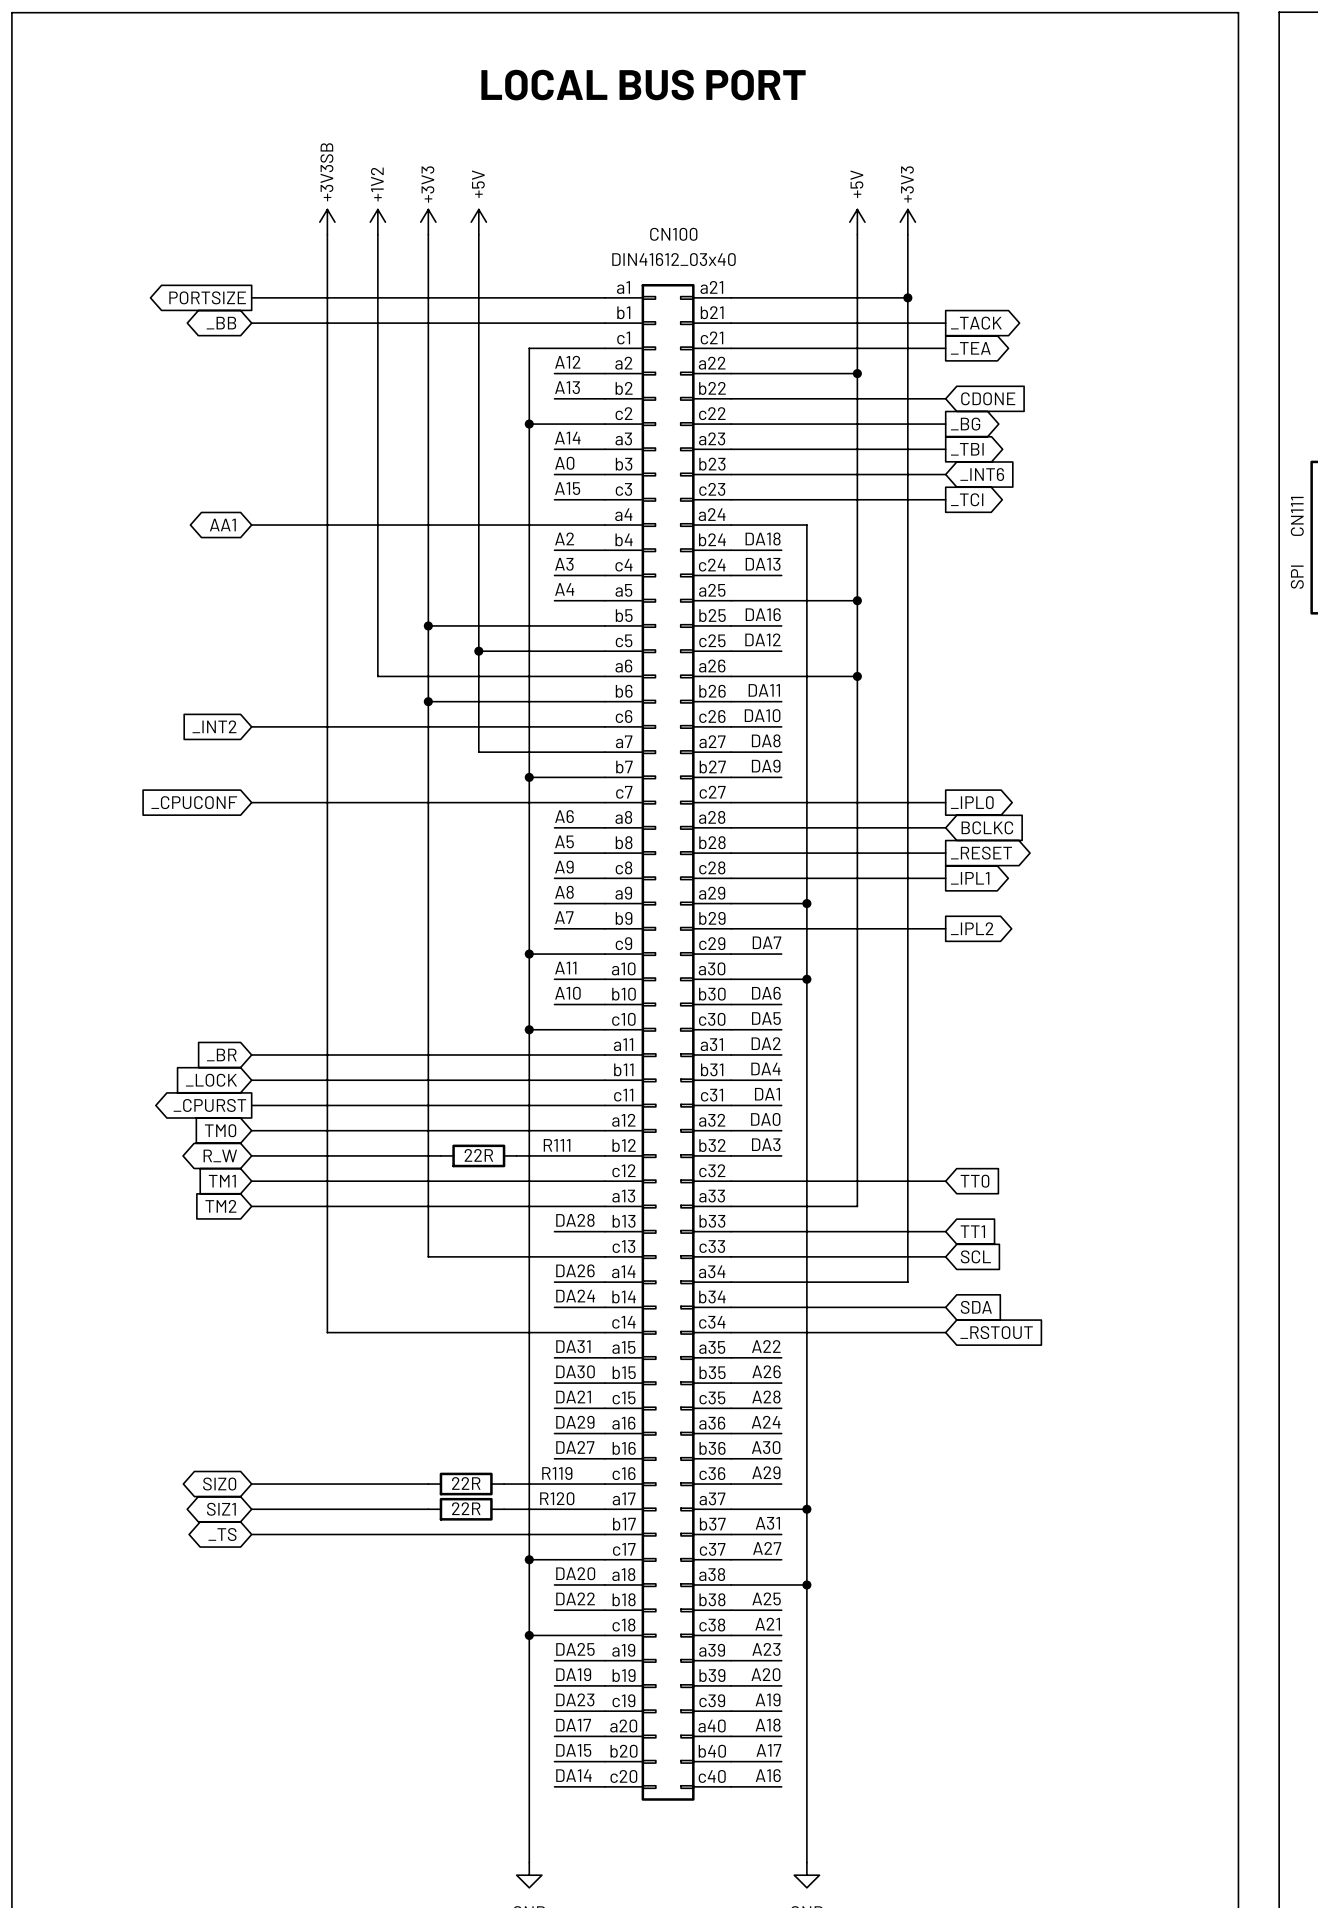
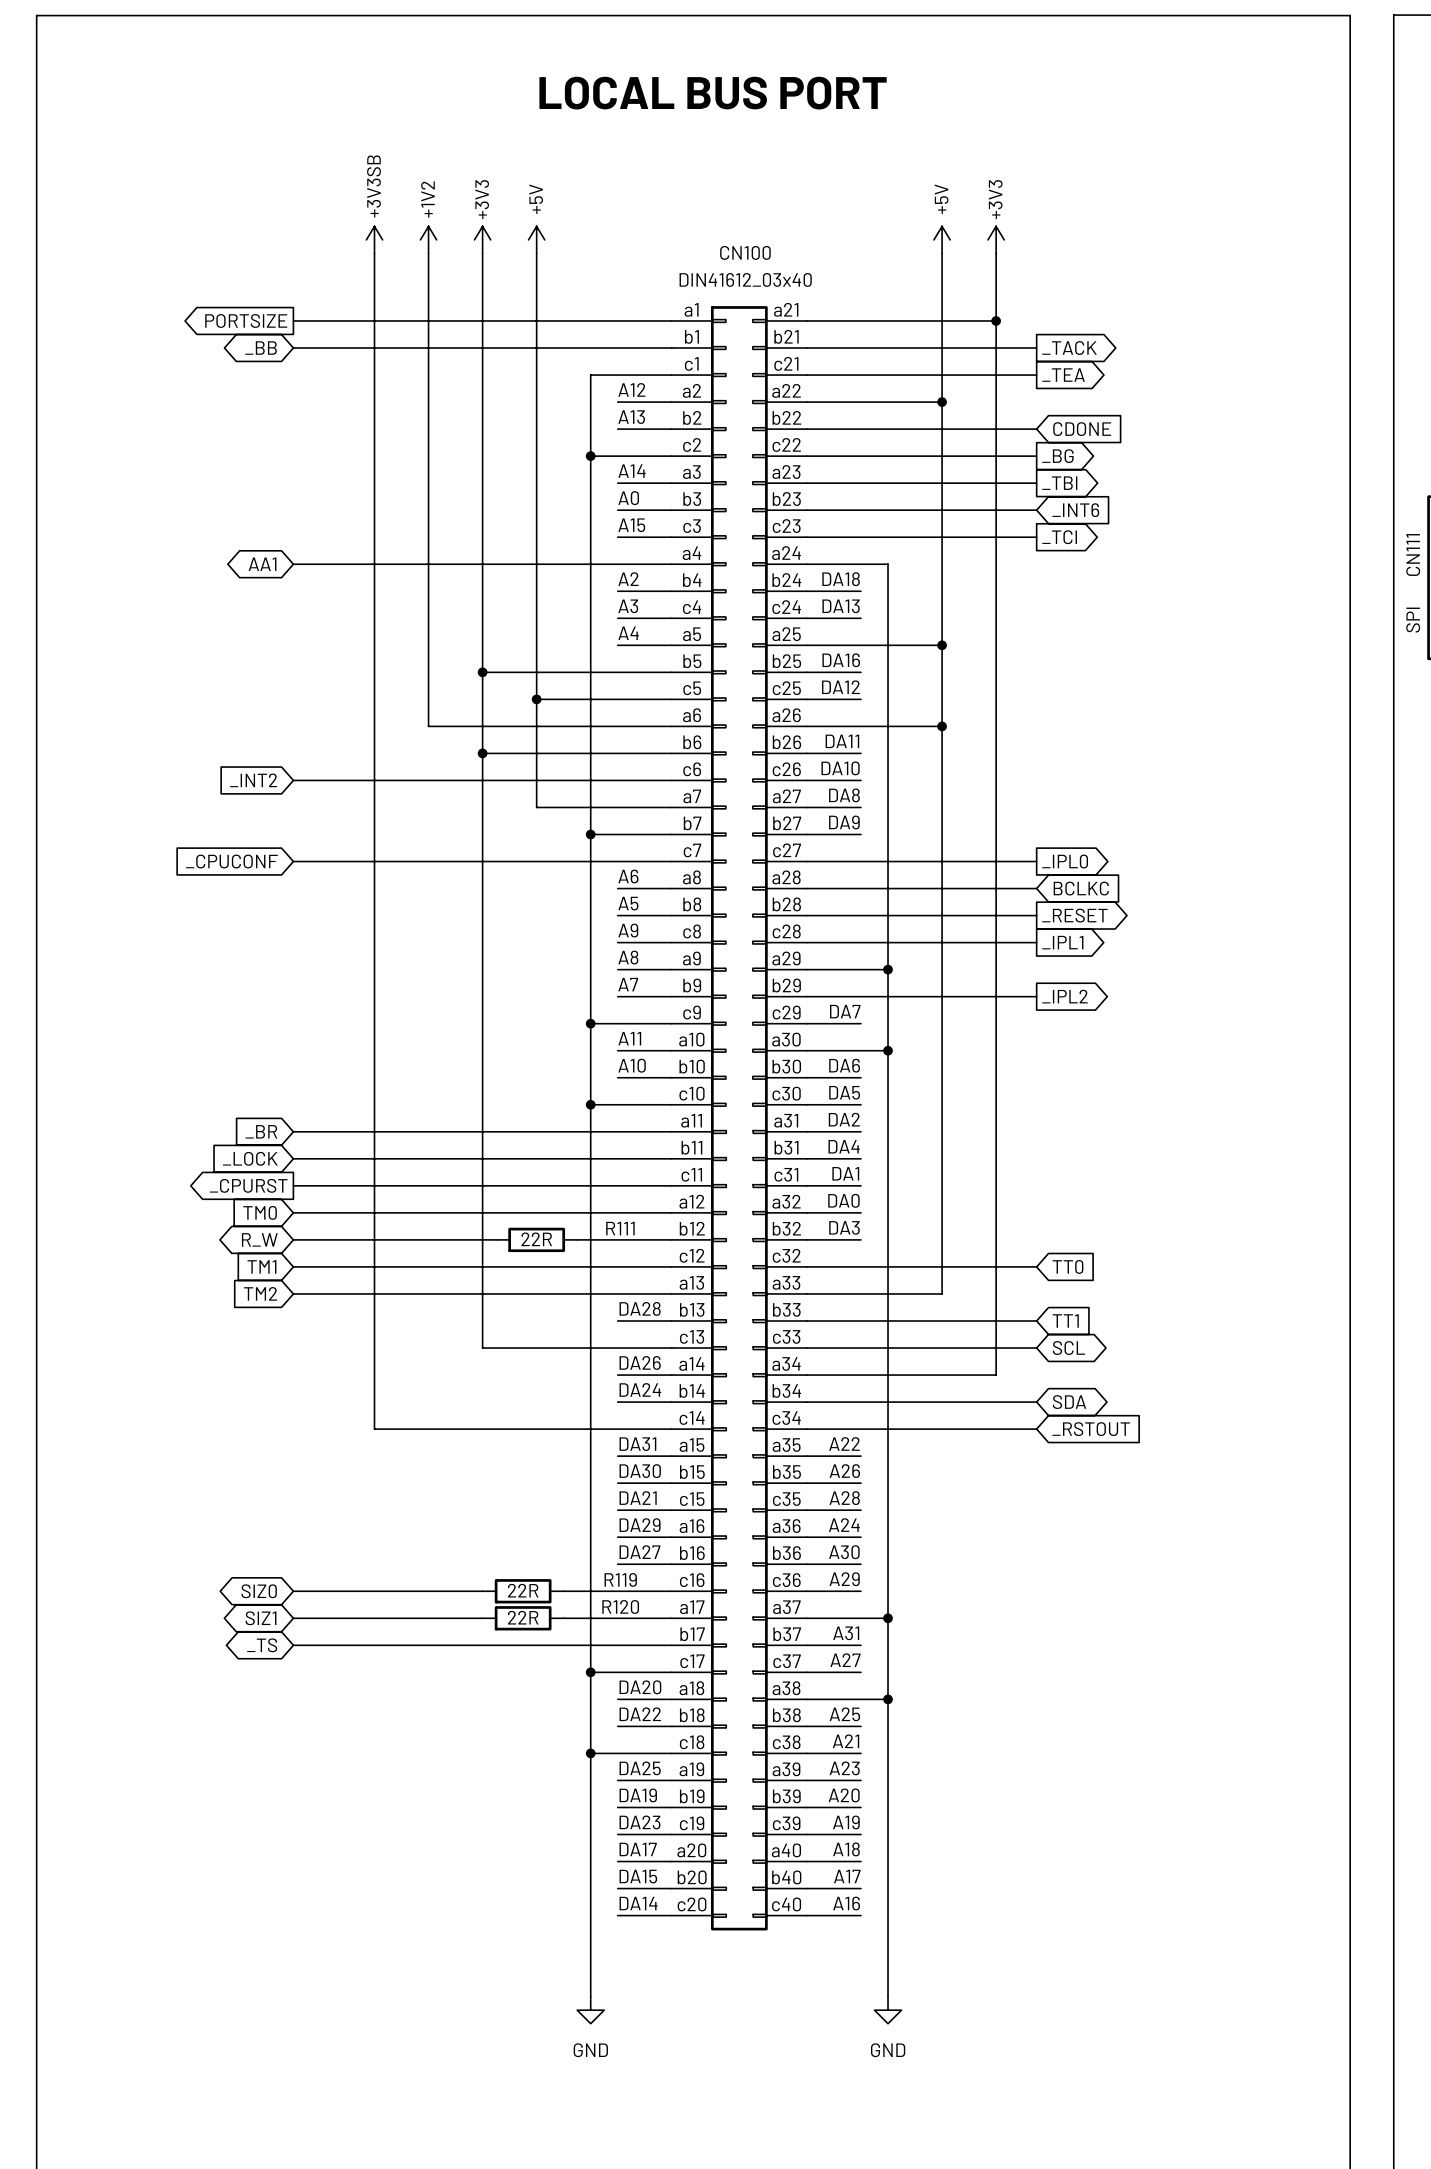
global label shape: input (975, 1256) -> bidirectional (1068, 1348)
global label shape: input (976, 1307) -> bidirectional (1069, 1402)

